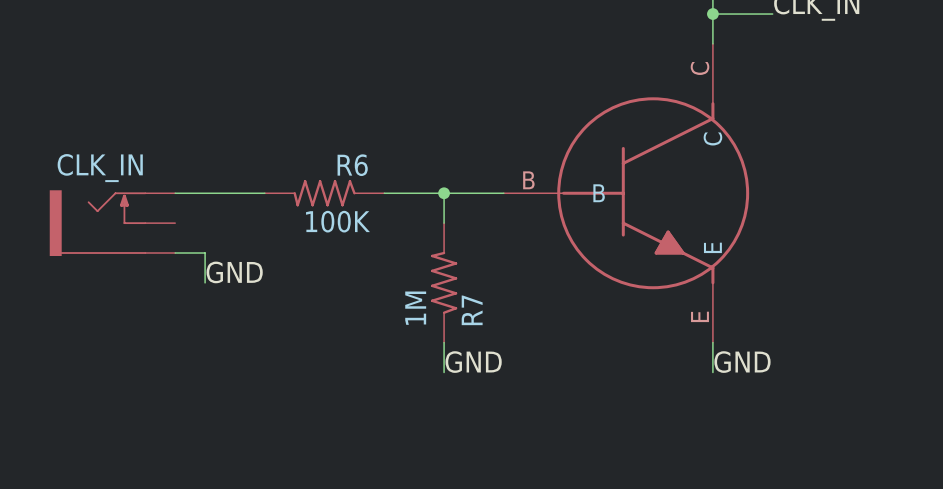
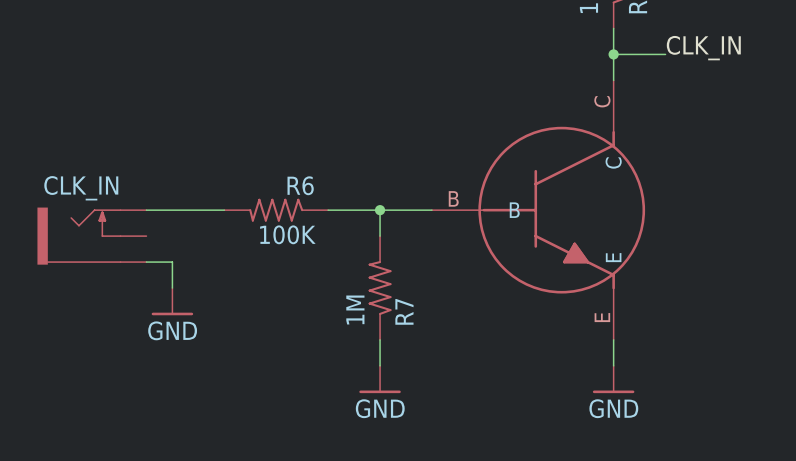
label: GND (234, 272) -> none
power symbol: none -> GND (172, 301)
label: GND (473, 362) -> none
label: GND (742, 362) -> none
power symbol: none -> GND (380, 379)
power symbol: none -> GND (613, 379)

